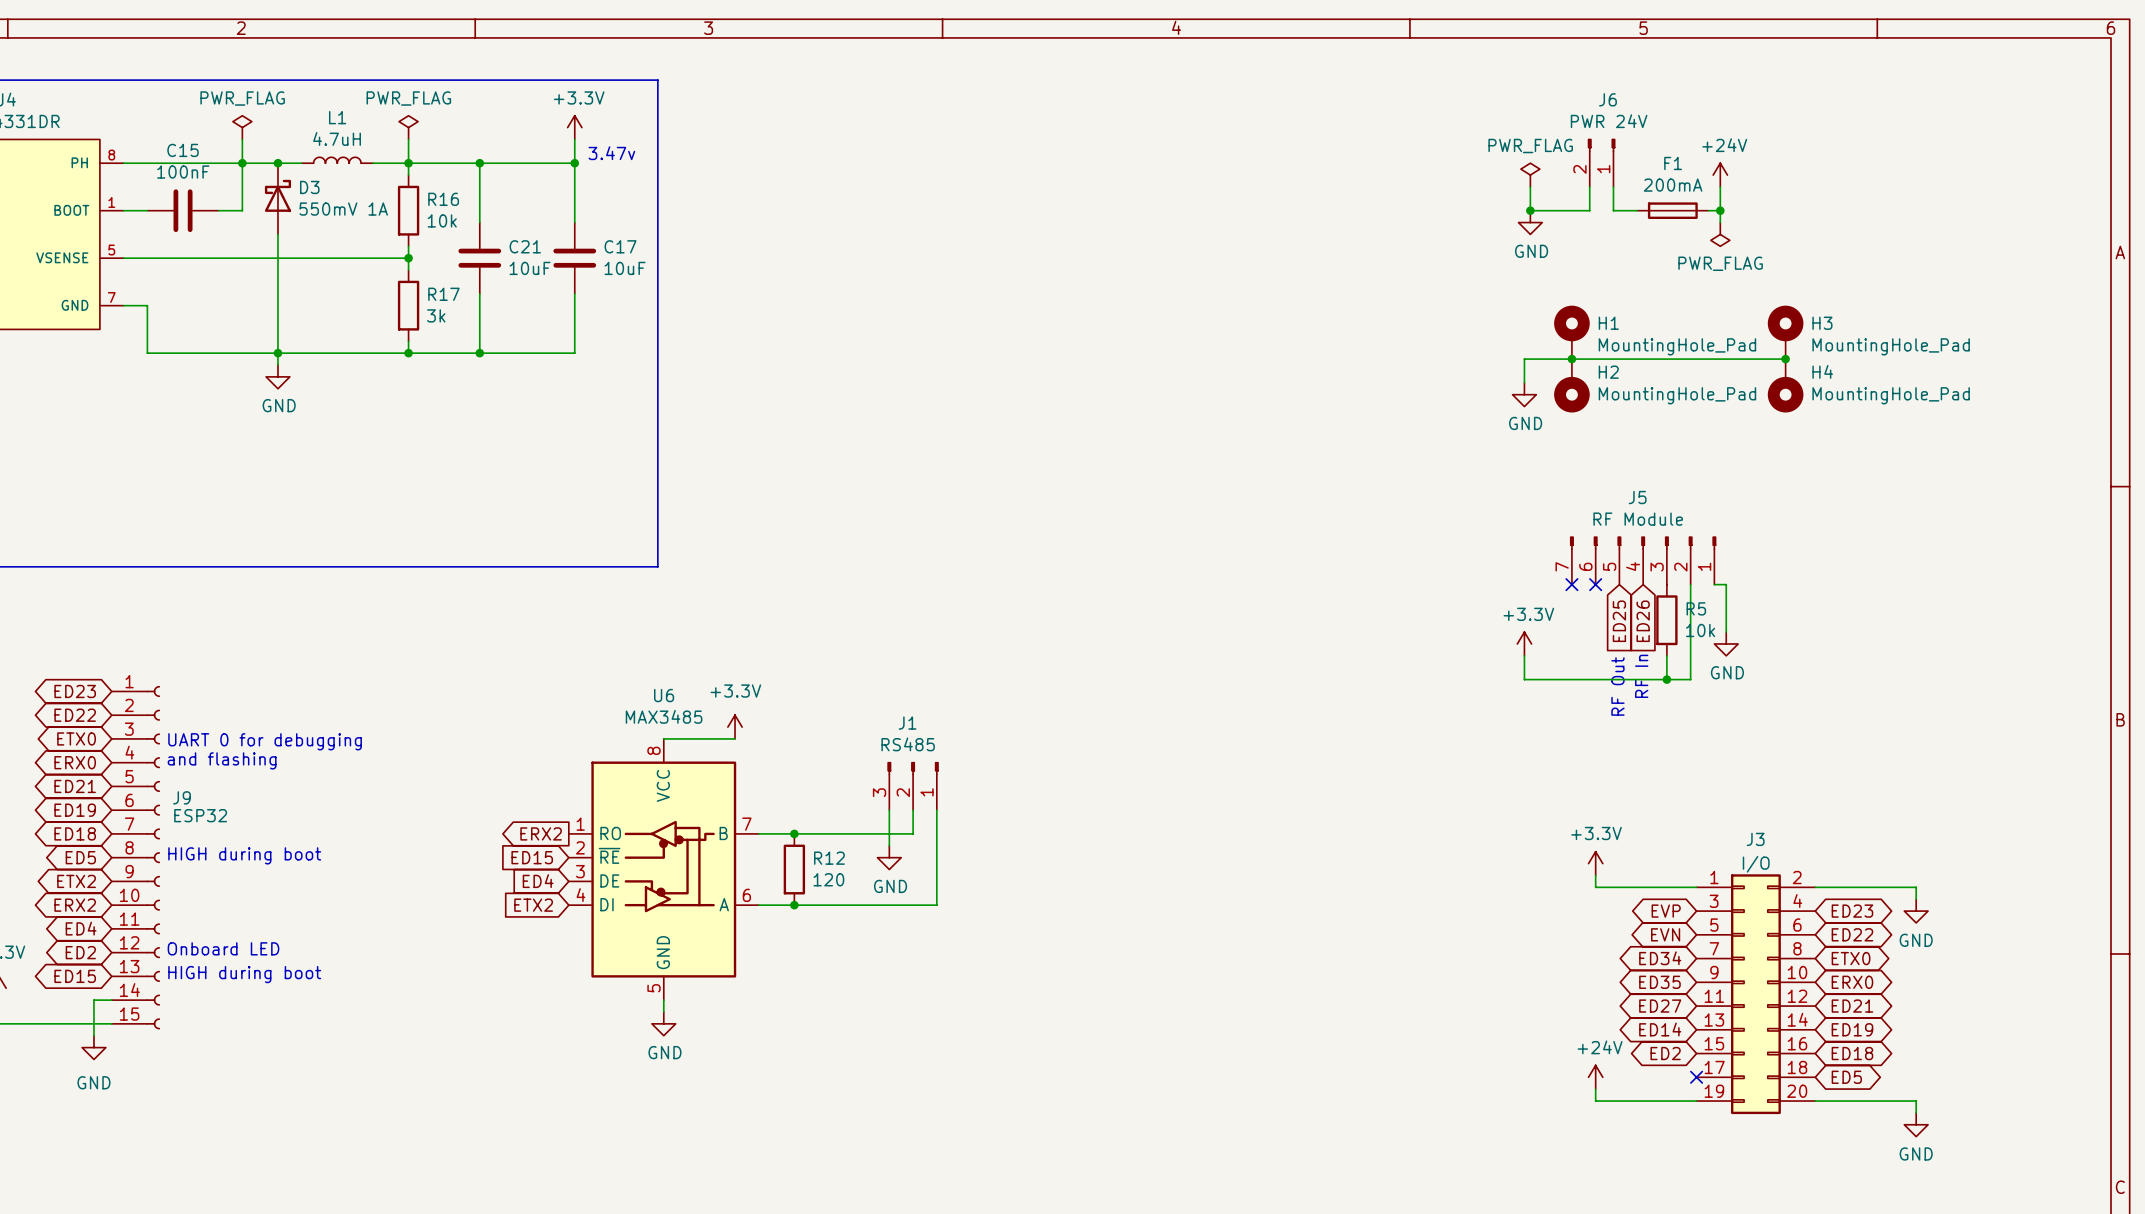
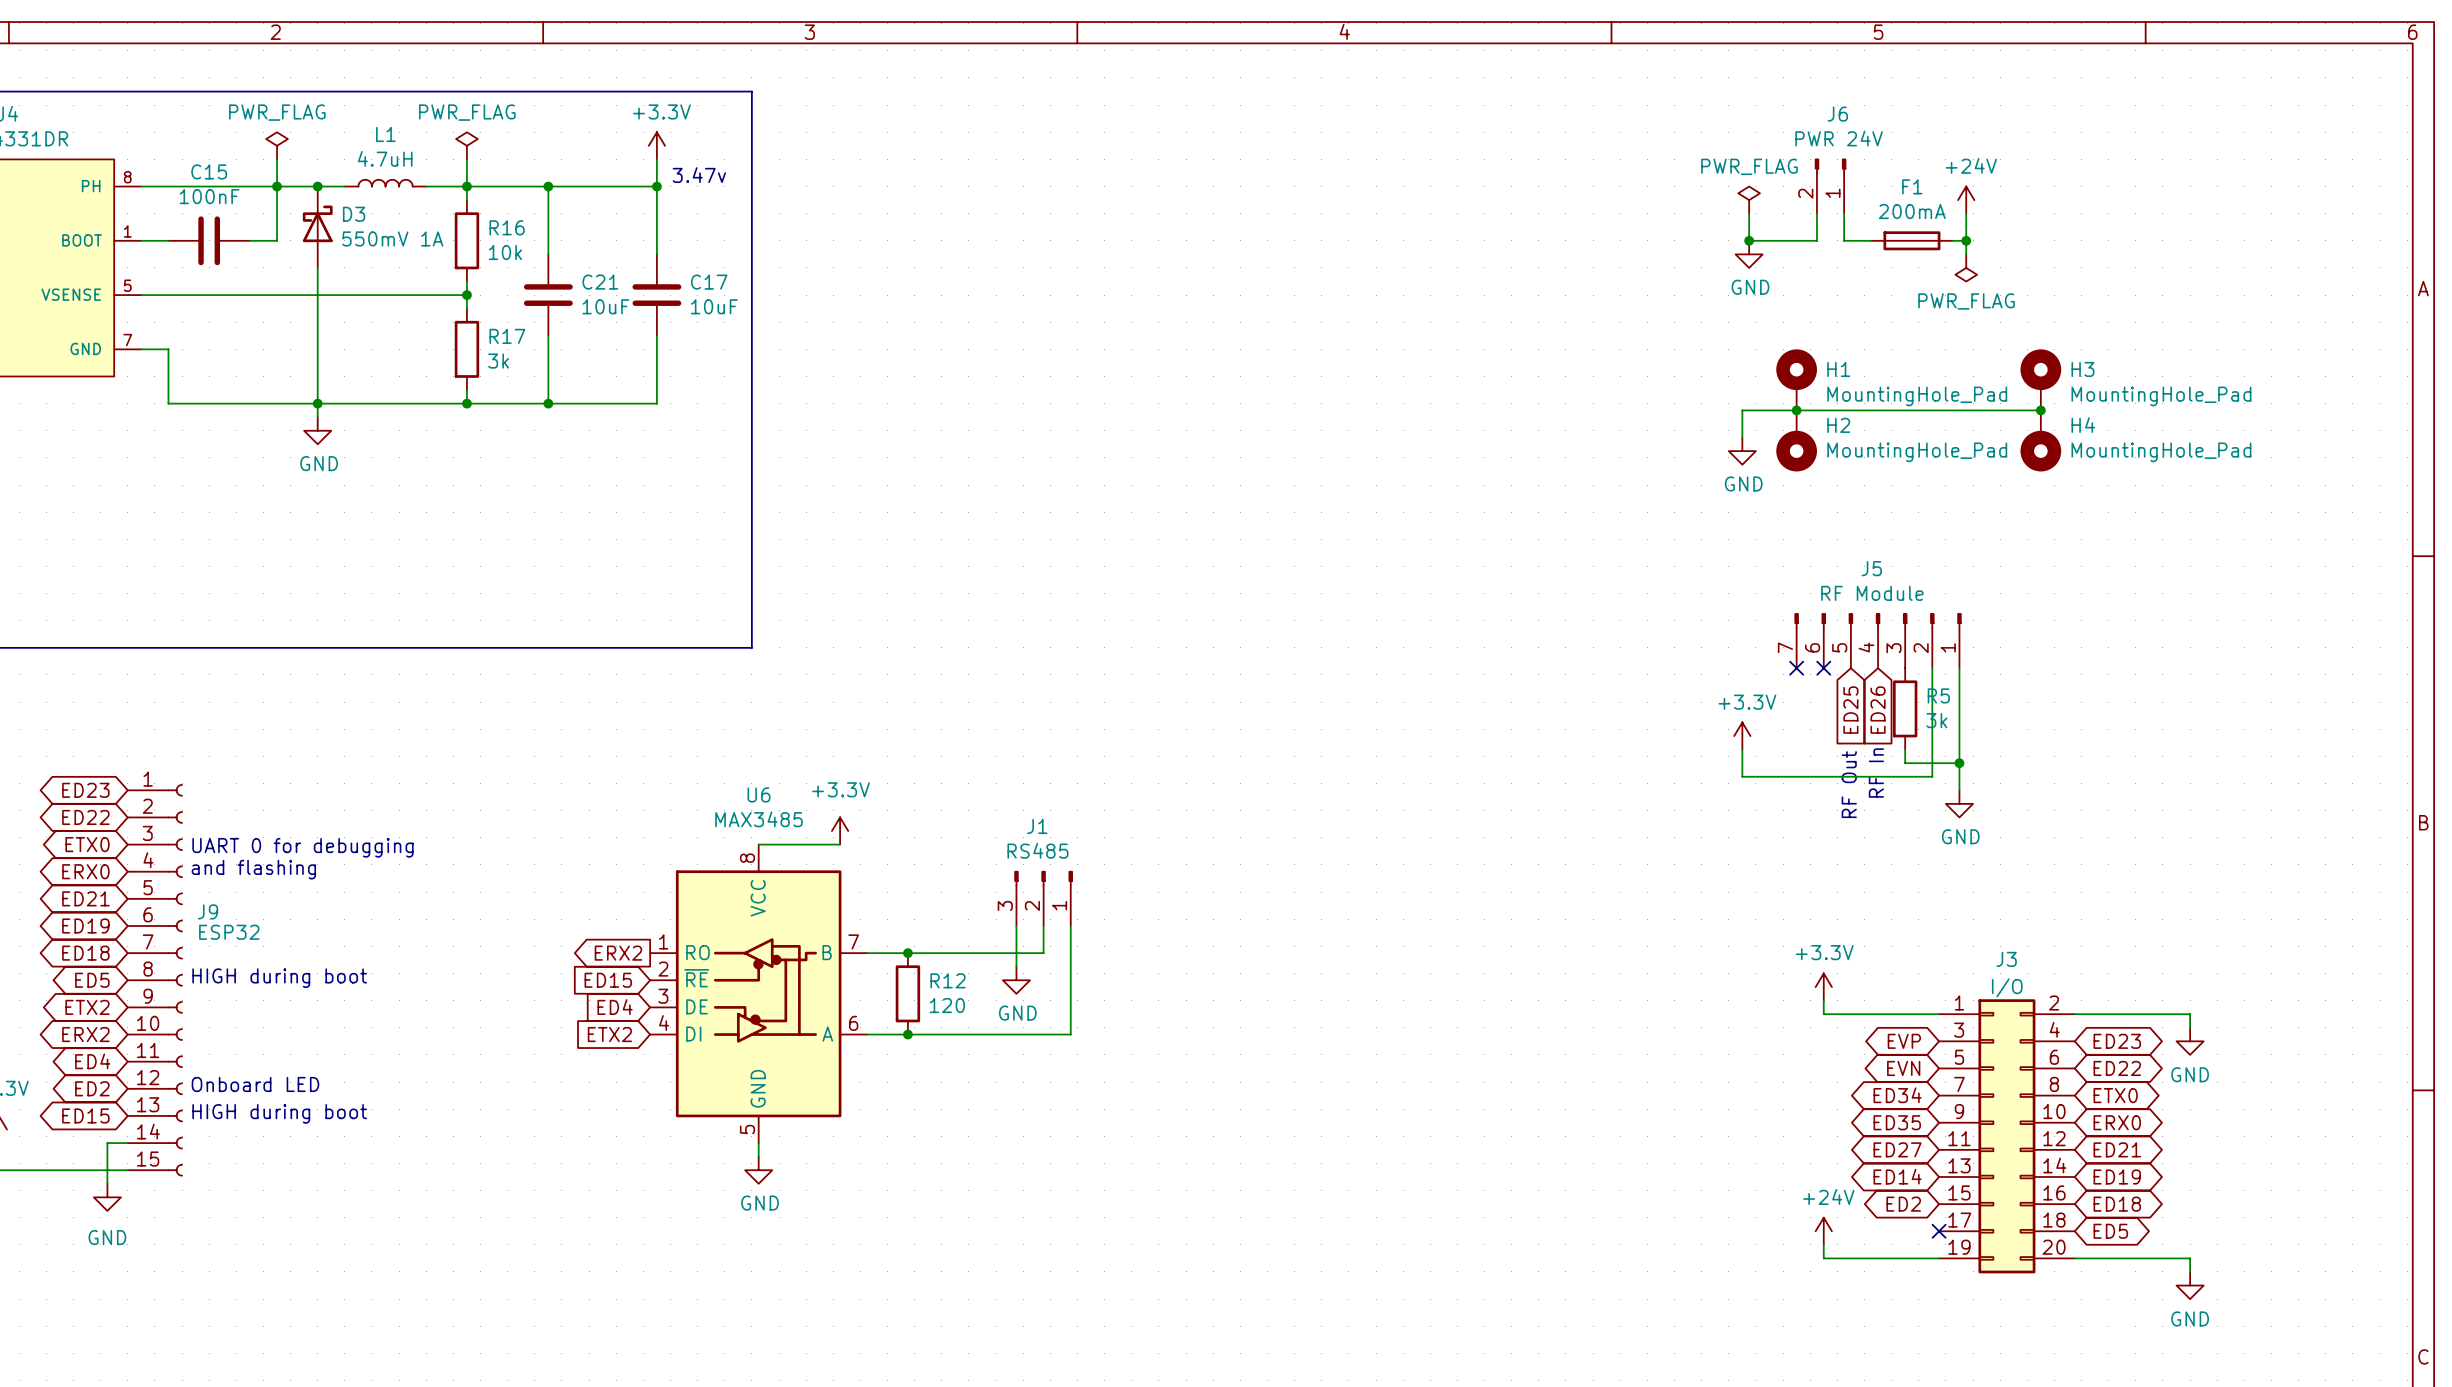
wire: (1714, 584) (1726, 584) (1726, 632) -> (1959, 668) (1959, 790)
R5 value: 10k (1700, 630) -> 3k (1936, 720)
power symbol position: GND (1726, 643) -> GND (1959, 803)
wire: (1666, 667) (1666, 679) -> (1905, 763) (1959, 763)
junction position: (1666, 679) -> (1959, 763)

